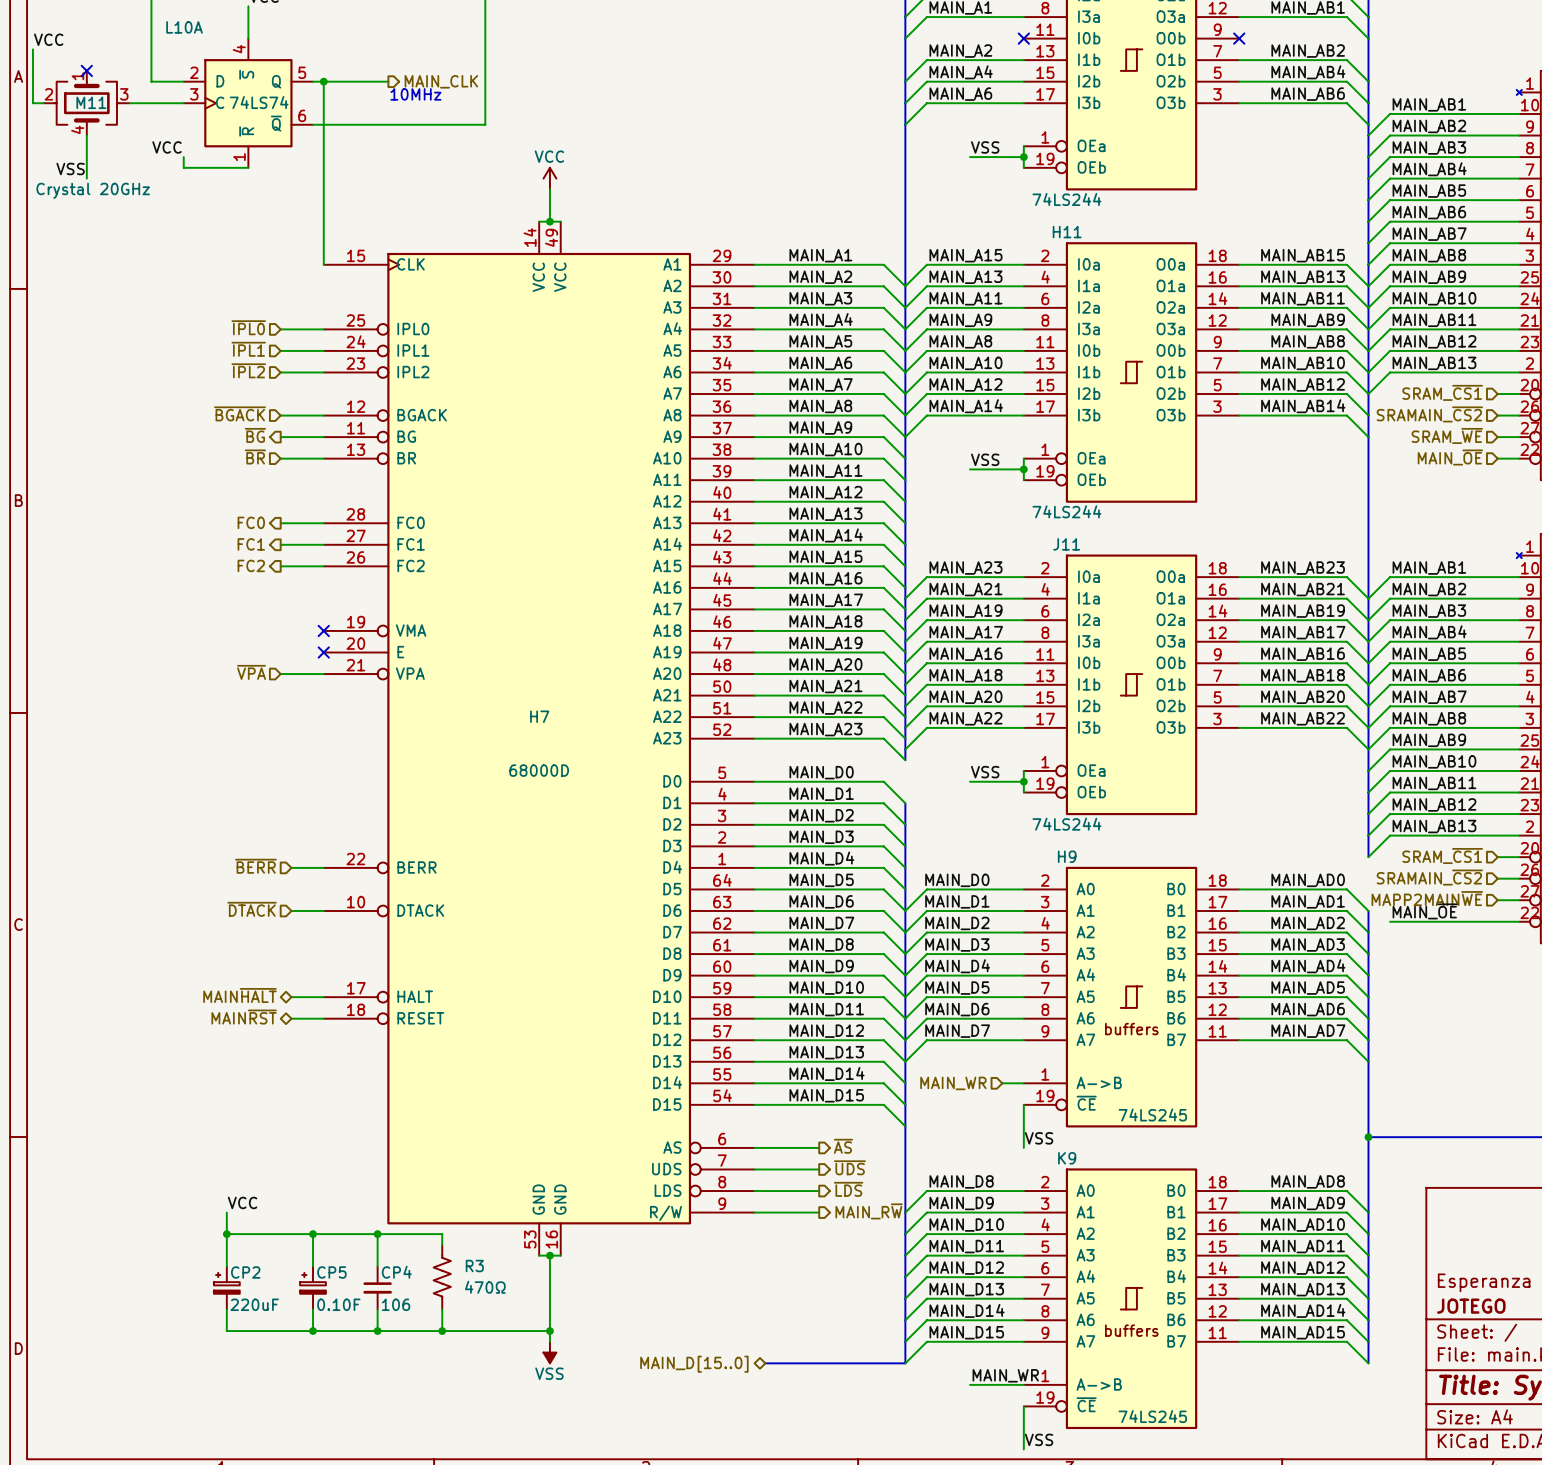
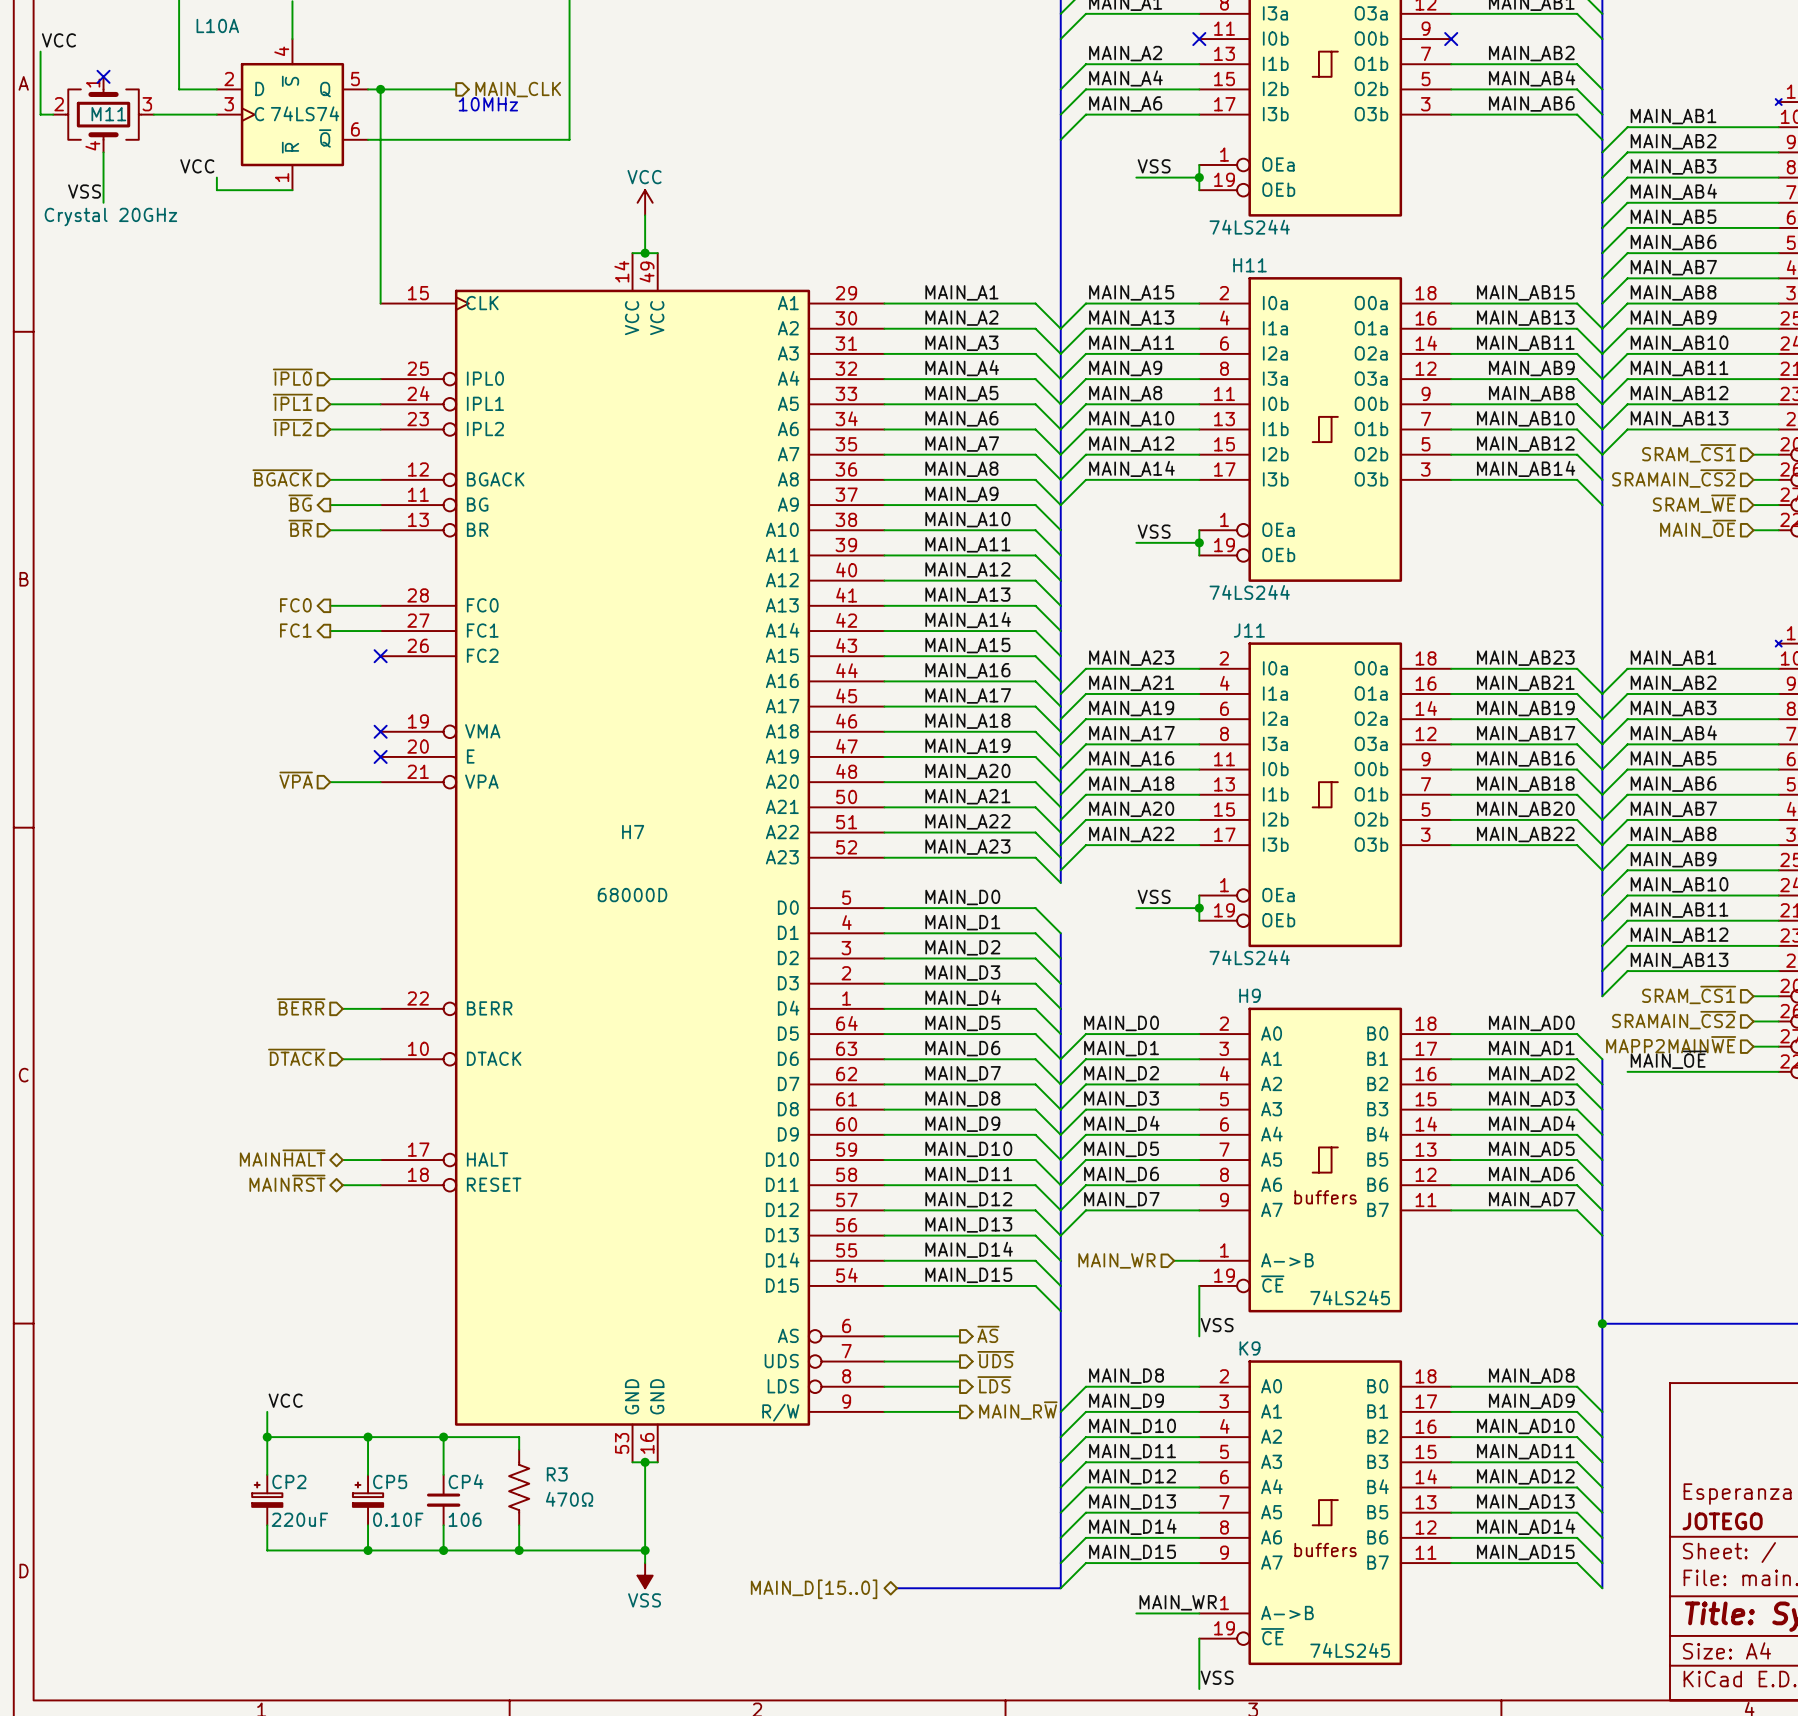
hierarchical label: FC2 (251, 565) -> none
wire: (280, 566) (323, 566) -> none
no-connect mark: none -> (380, 656)

